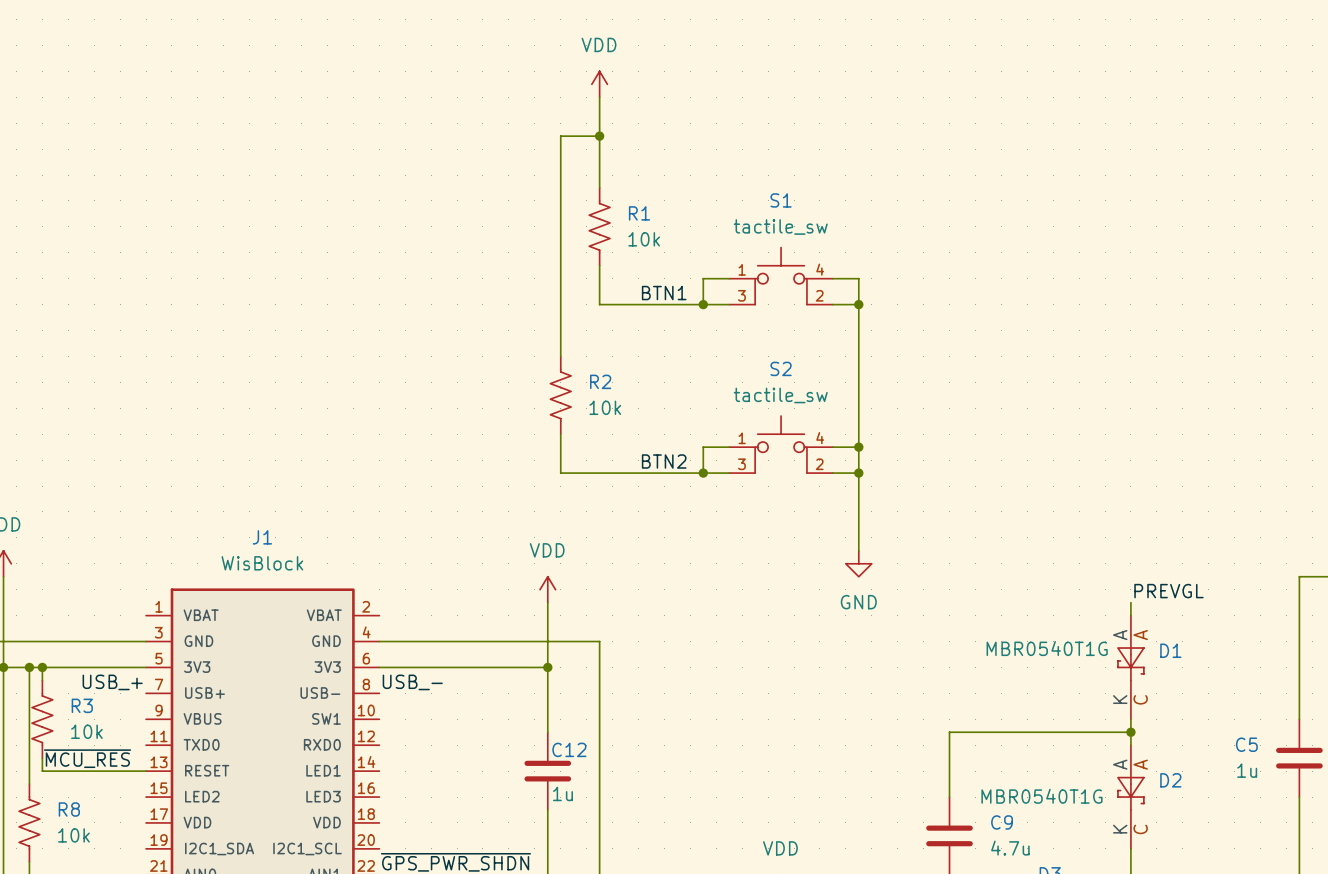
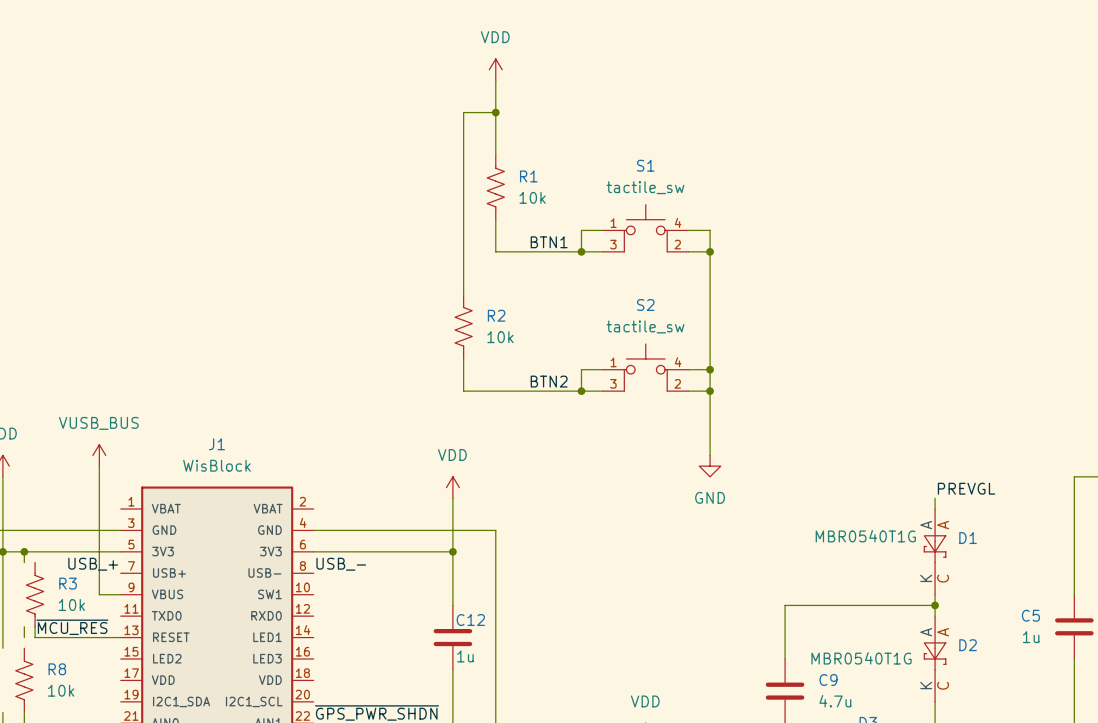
power symbol: none -> VUSB_BUS (99, 455)
wire: none -> (99, 466) (99, 594) (120, 594)
wire: (42, 667) (42, 680) -> none
junction: (42, 667) -> none
wire: (29, 680) (29, 758) -> none
wire: (29, 771) (29, 784) -> none
wire: (3, 784) (3, 861) -> none

